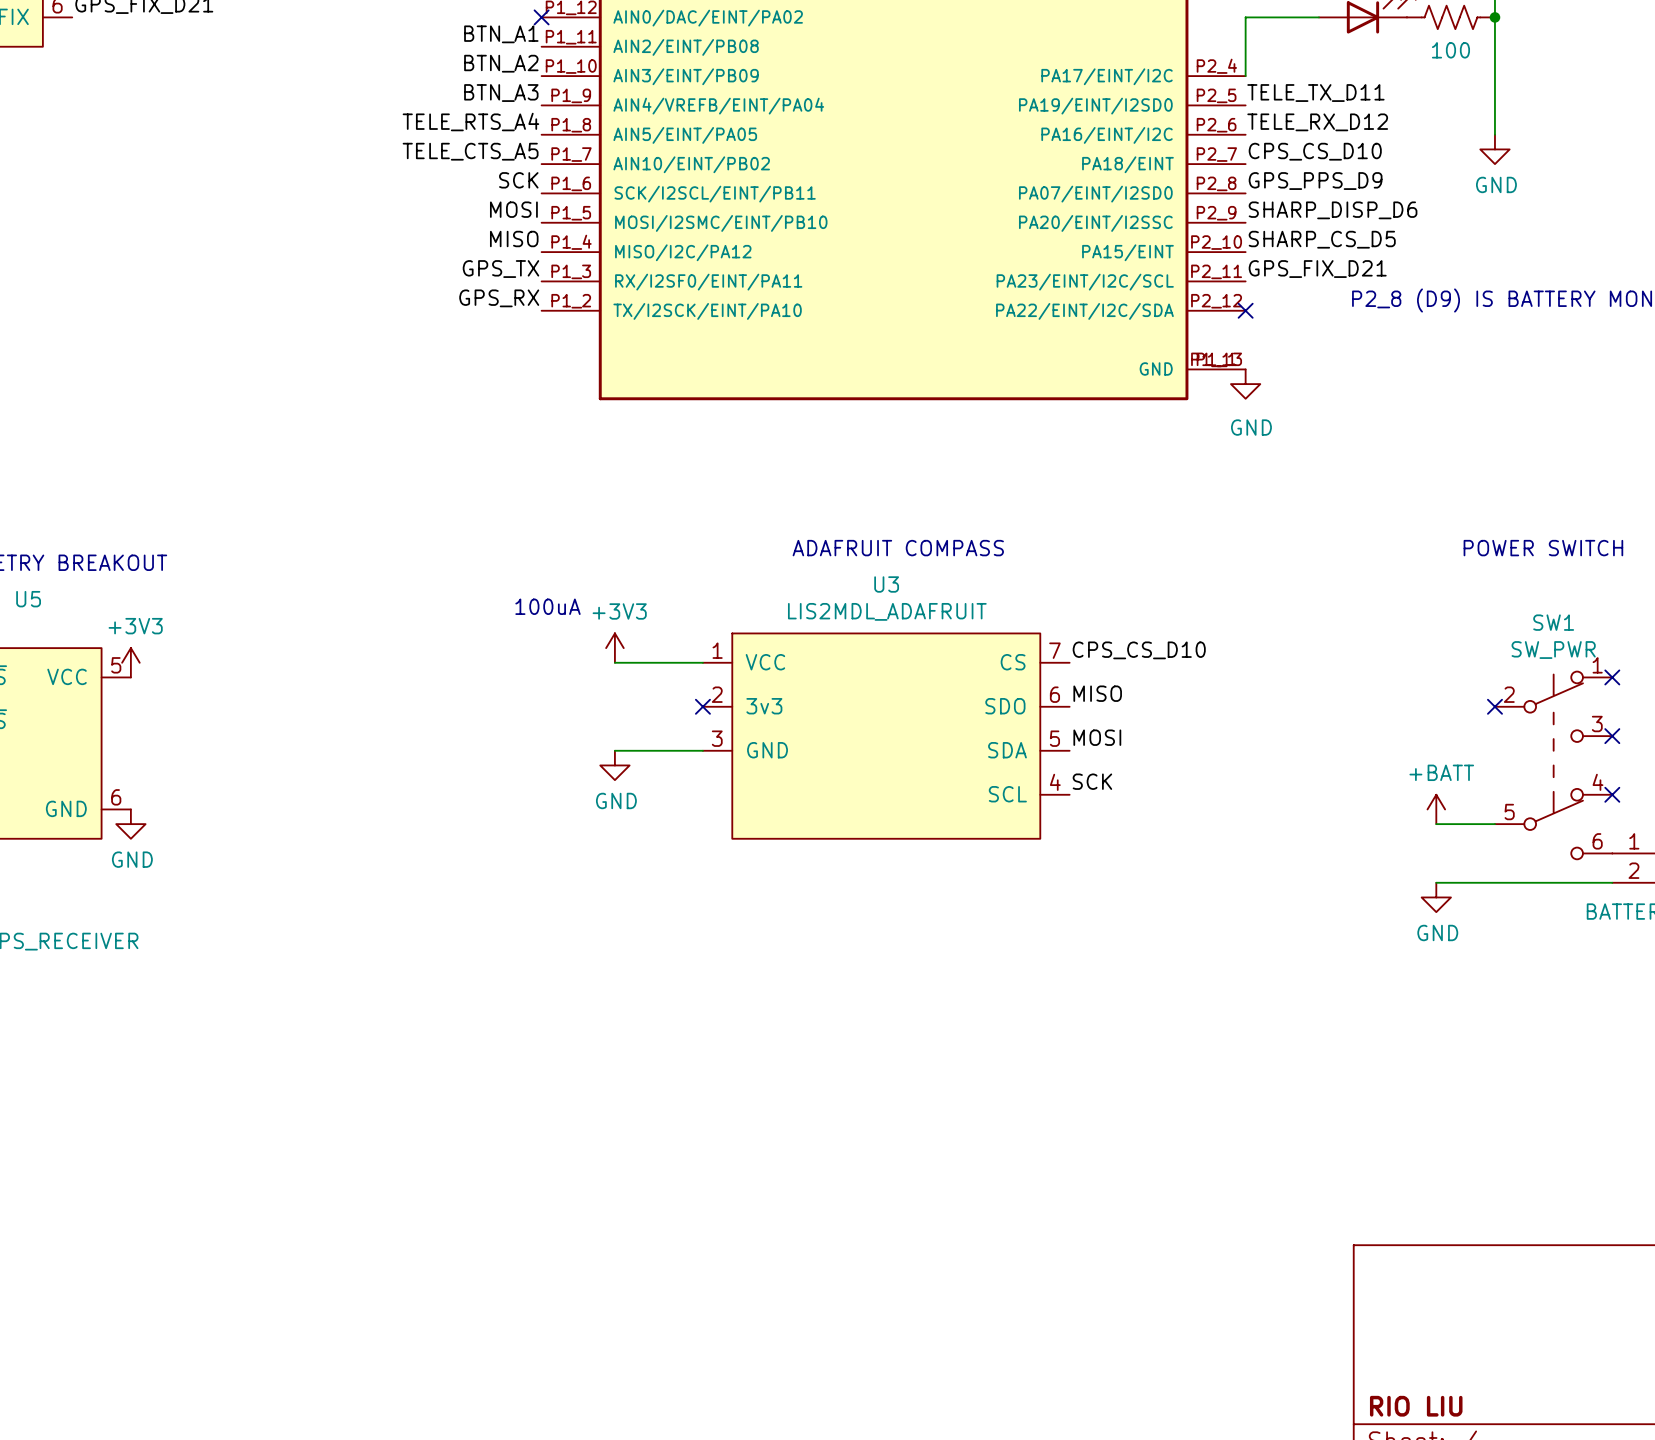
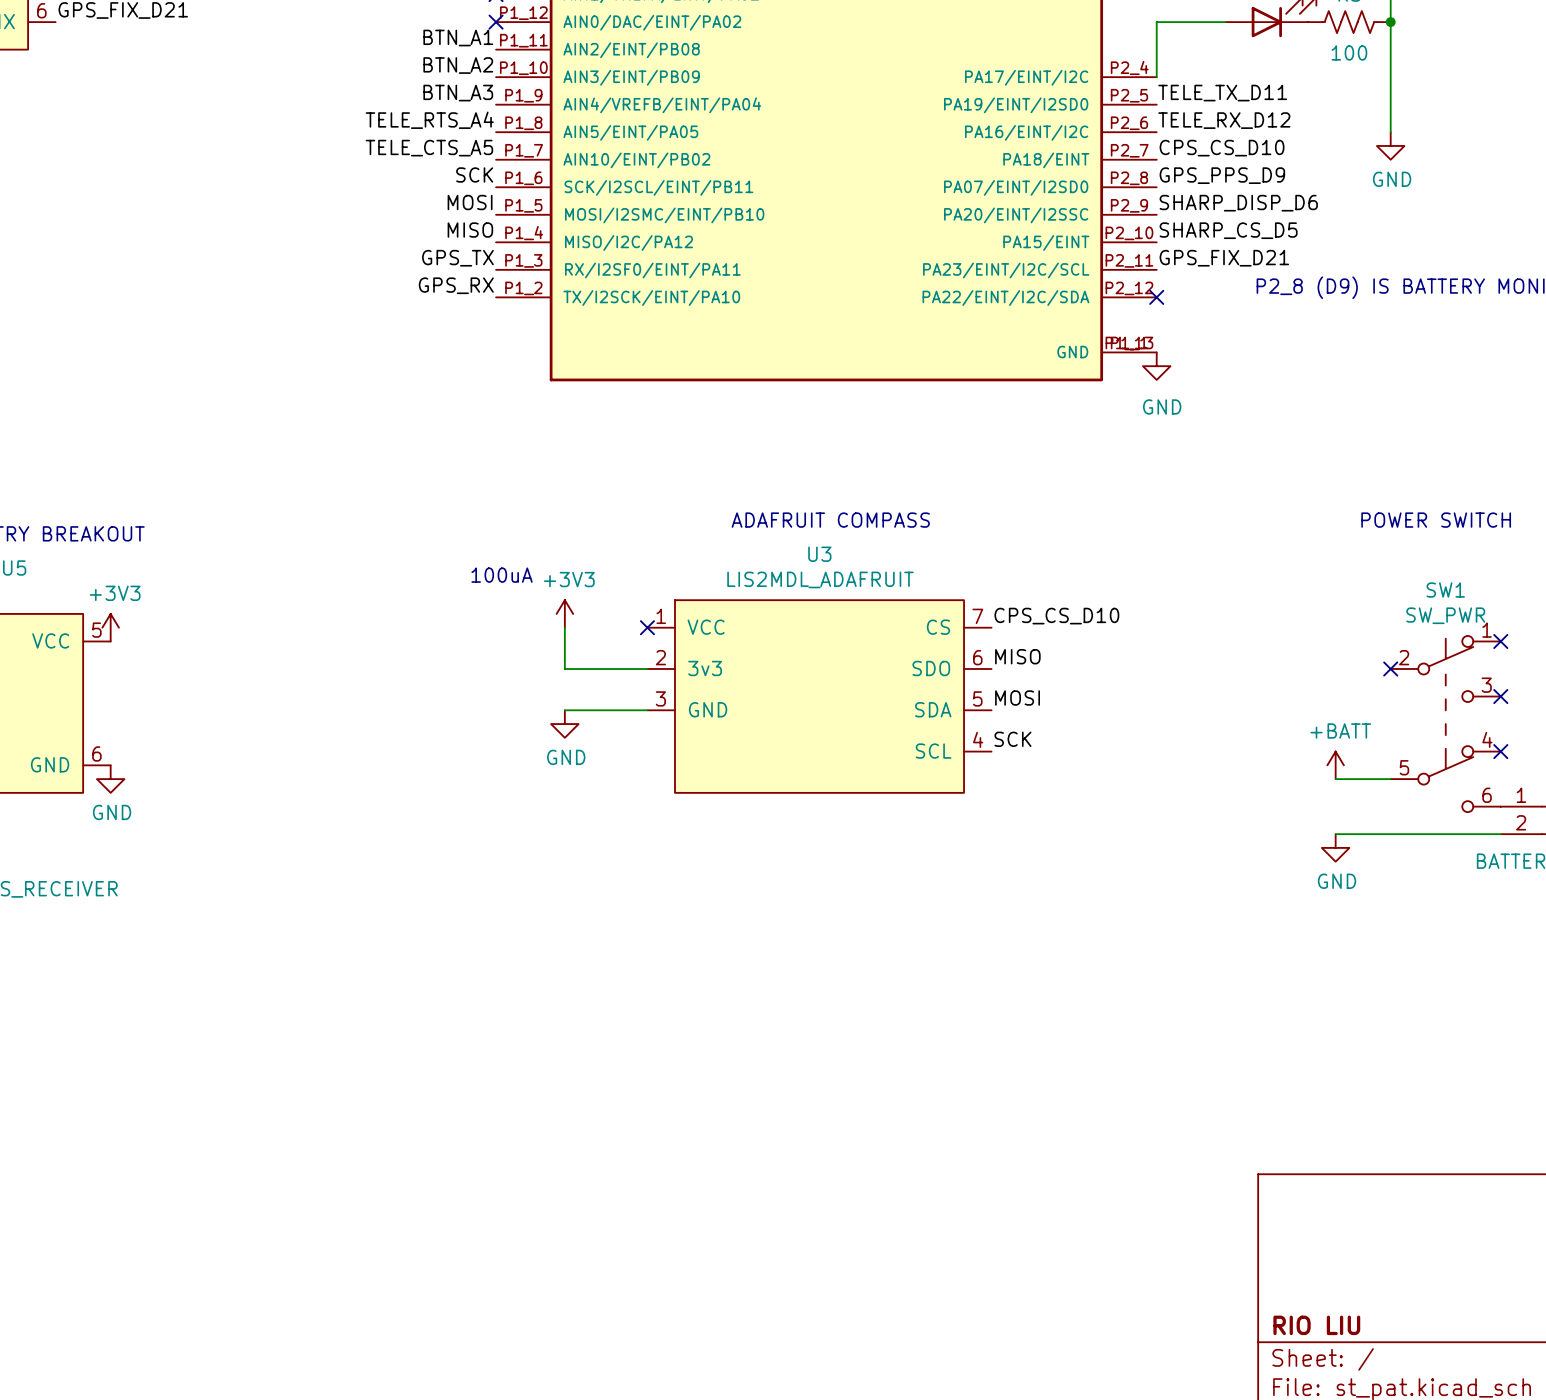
wire: (614, 662) (702, 662) -> (564, 627) (564, 669) (647, 669)
no-connect mark position: (702, 706) -> (647, 627)

